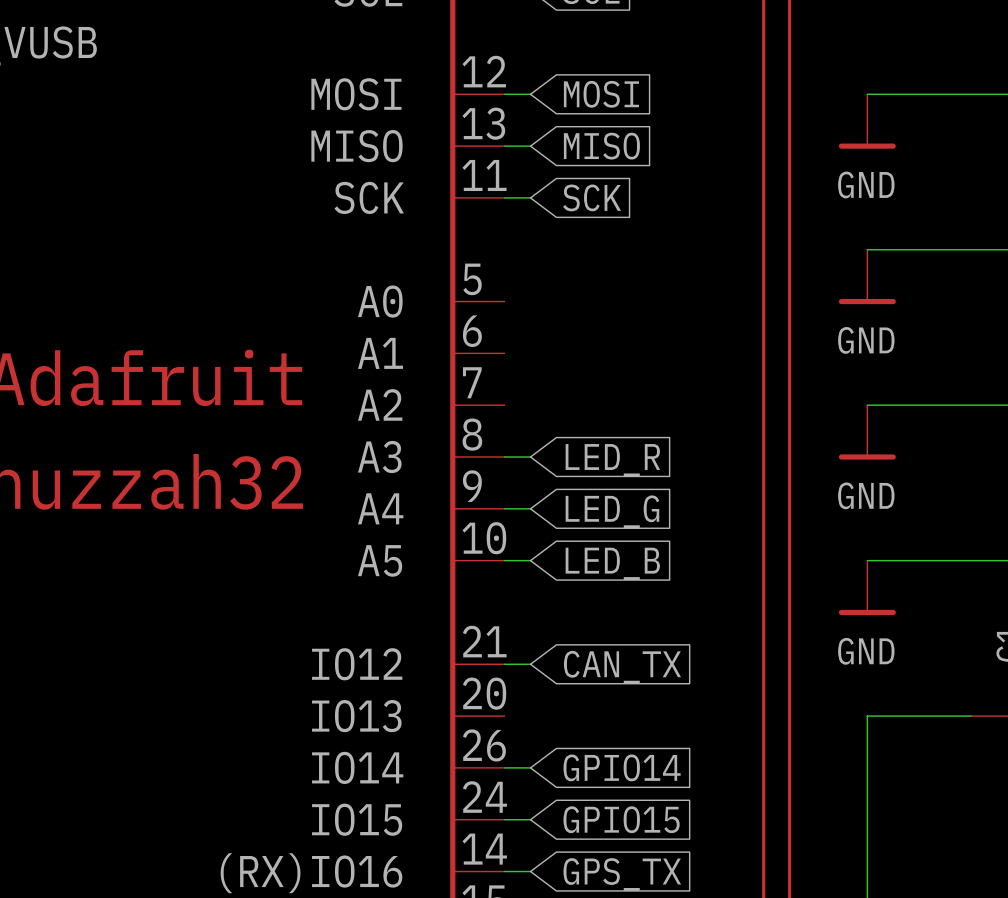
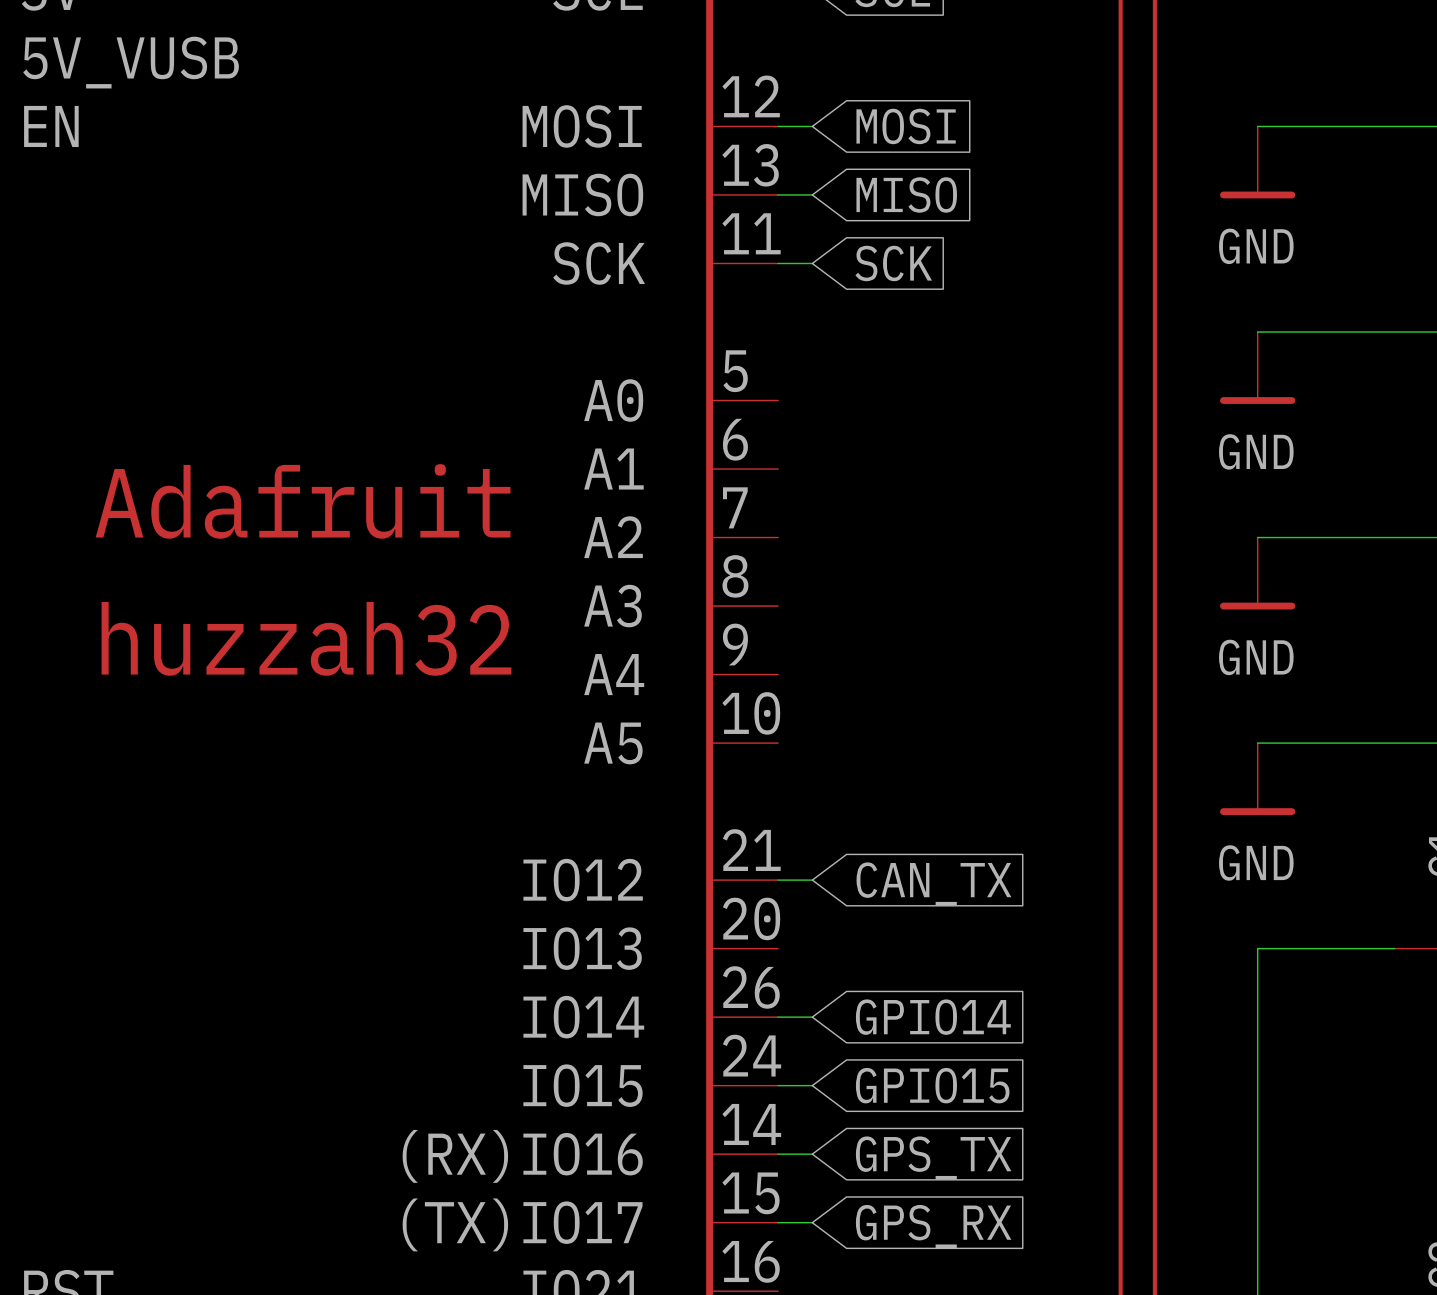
wire: (504, 457) (530, 457) -> none
global label: LED_R (612, 460) -> none
wire: (504, 508) (530, 508) -> none
global label: LED_G (612, 511) -> none
wire: (504, 560) (530, 560) -> none
global label: LED_B (612, 563) -> none

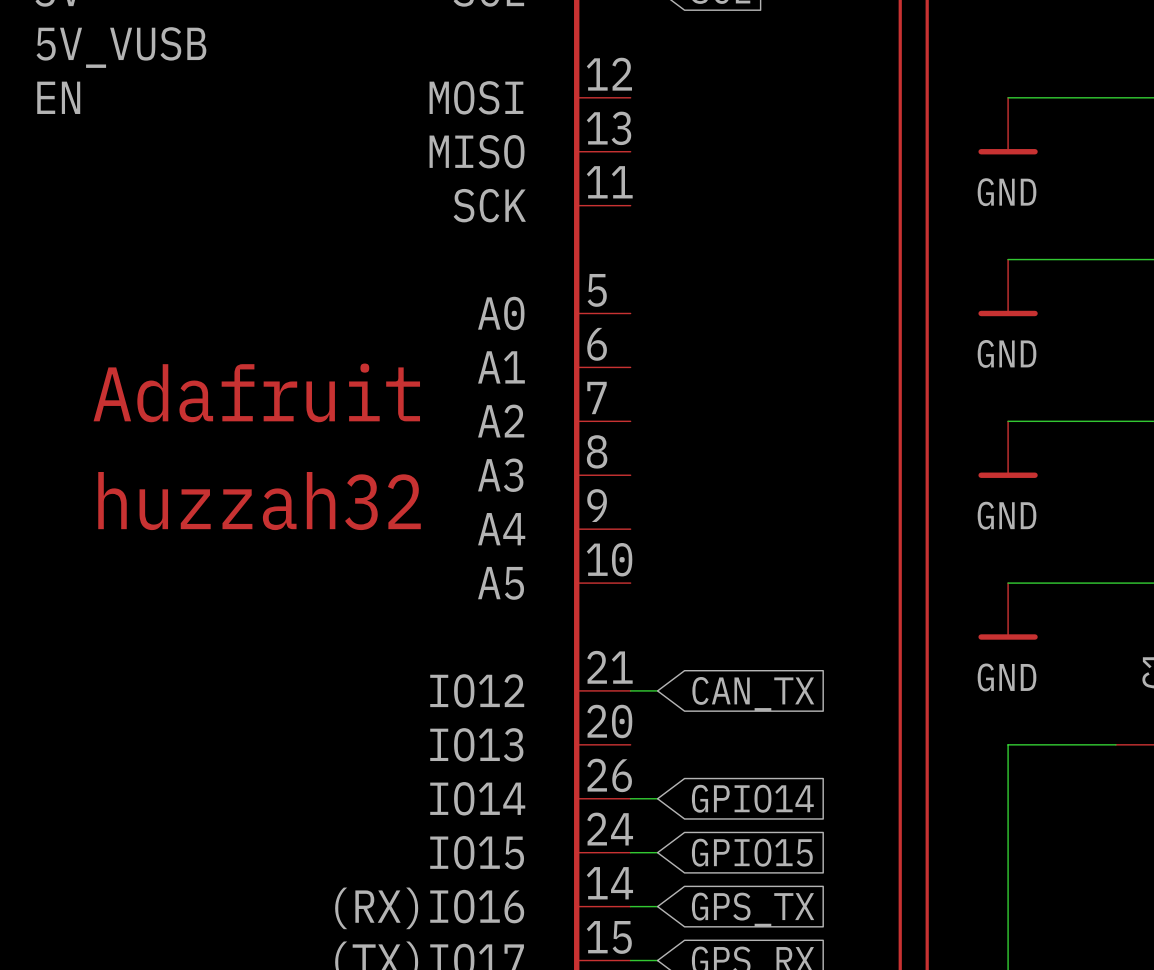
wire: (778, 126) (812, 126) -> none
global label: MOSI (906, 126) -> none
wire: (778, 194) (812, 194) -> none
global label: MISO (906, 194) -> none
wire: (778, 263) (812, 263) -> none
global label: SCK (893, 263) -> none

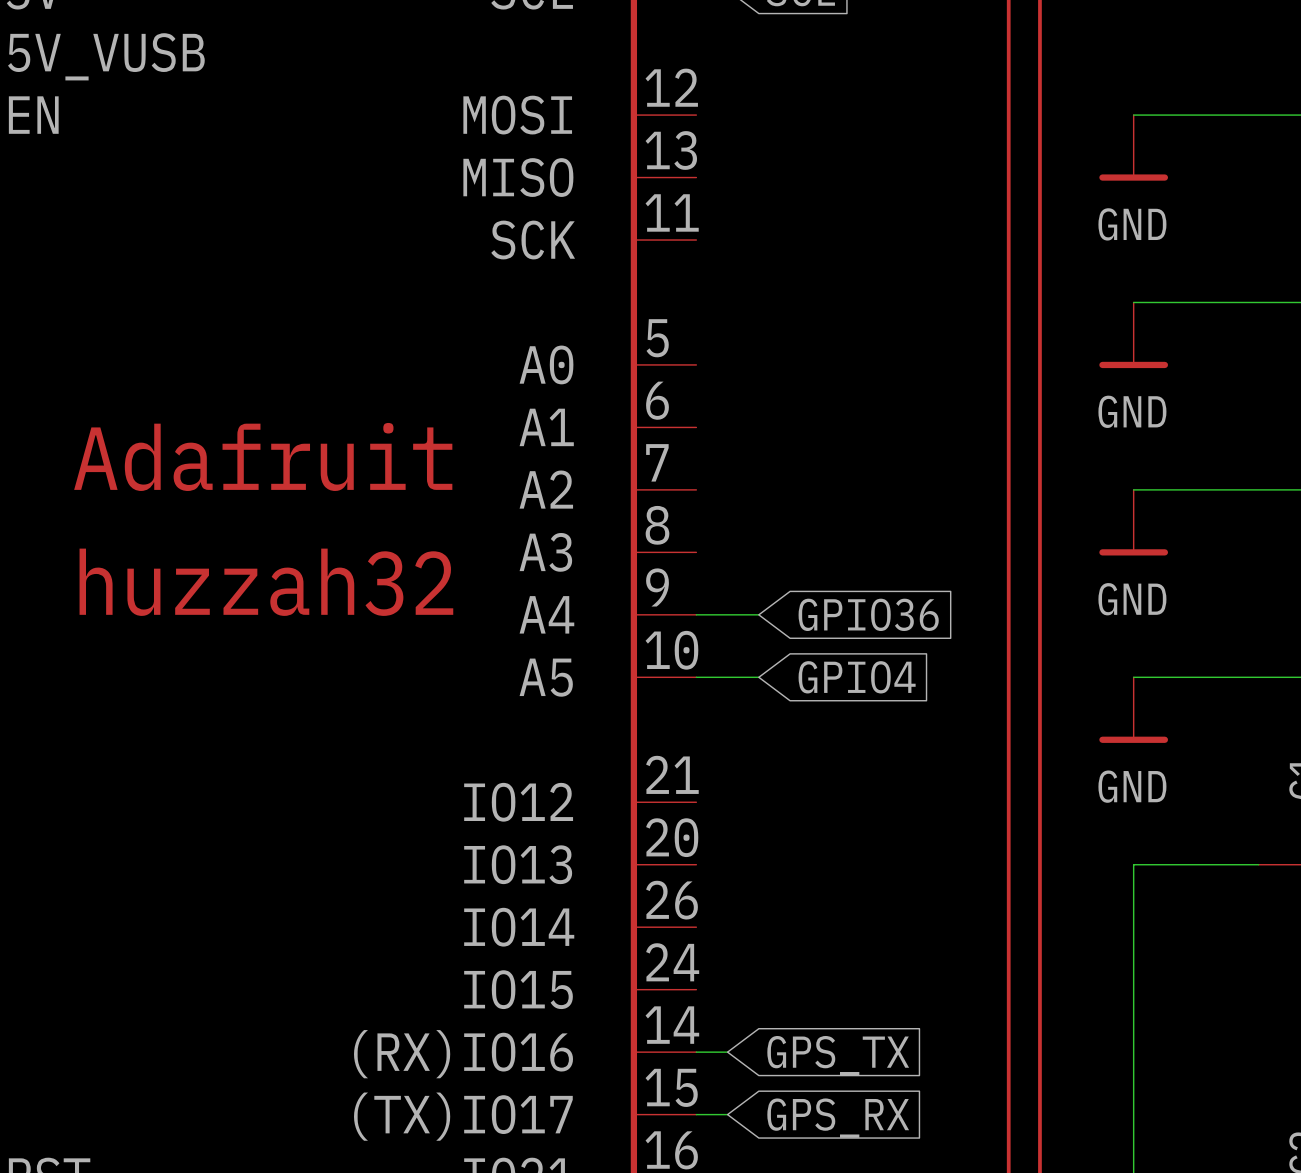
wire: none -> (696, 614) (758, 614)
global label: none -> GPIO36 (868, 614)
wire: none -> (696, 677) (758, 677)
global label: none -> GPIO4 (857, 677)
wire: (630, 690) (657, 690) -> none
global label: CAN_TX (753, 693) -> none
wire: (630, 798) (657, 798) -> none
global label: GPIO14 (752, 798) -> none
wire: (630, 852) (657, 852) -> none
global label: GPIO15 (752, 852) -> none

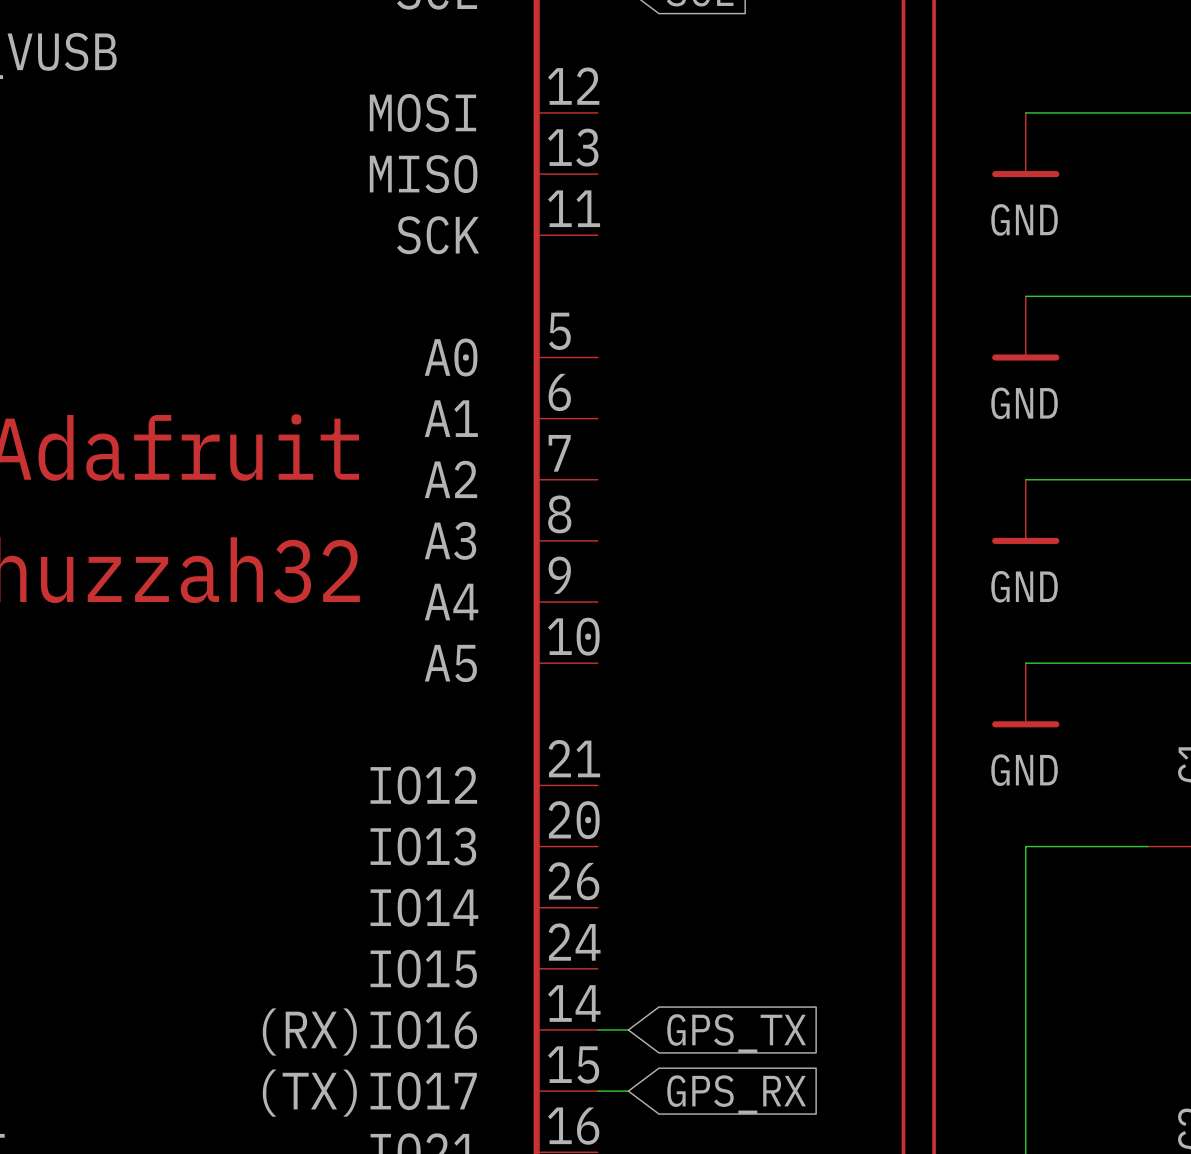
wire: (696, 614) (758, 614) -> none
global label: GPIO36 (868, 614) -> none
wire: (696, 677) (758, 677) -> none
global label: GPIO4 (857, 677) -> none

